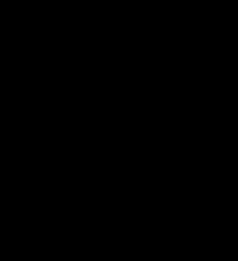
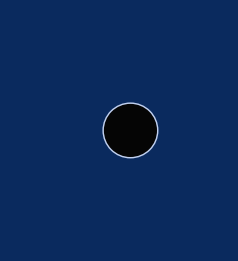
part: none -> (130, 130)

